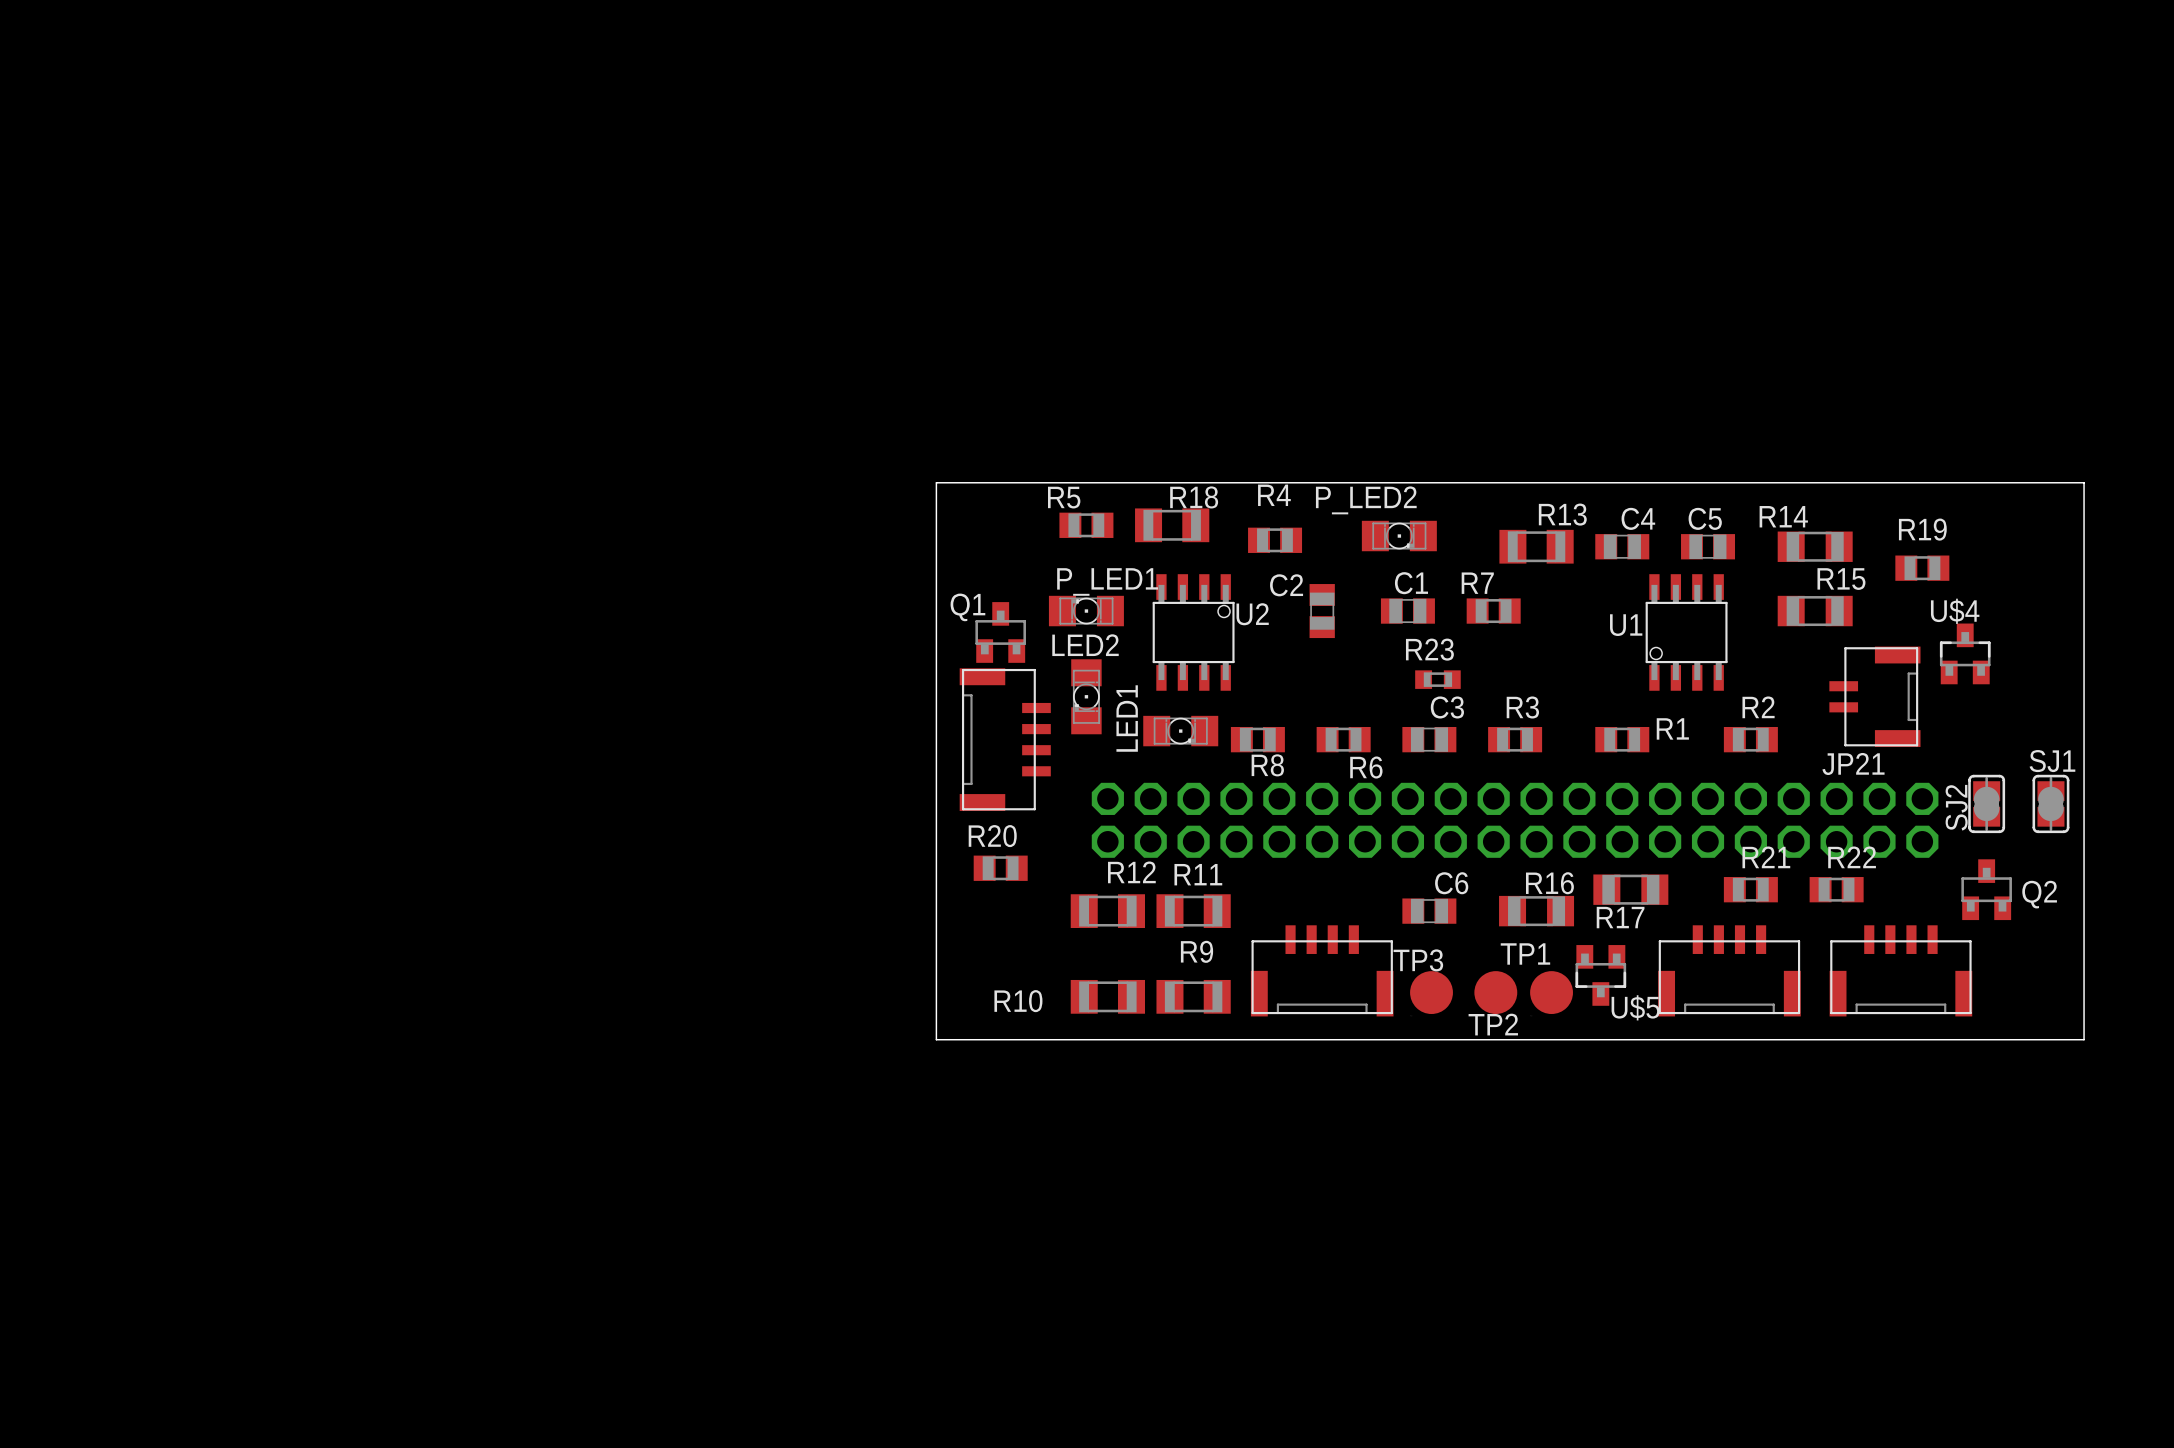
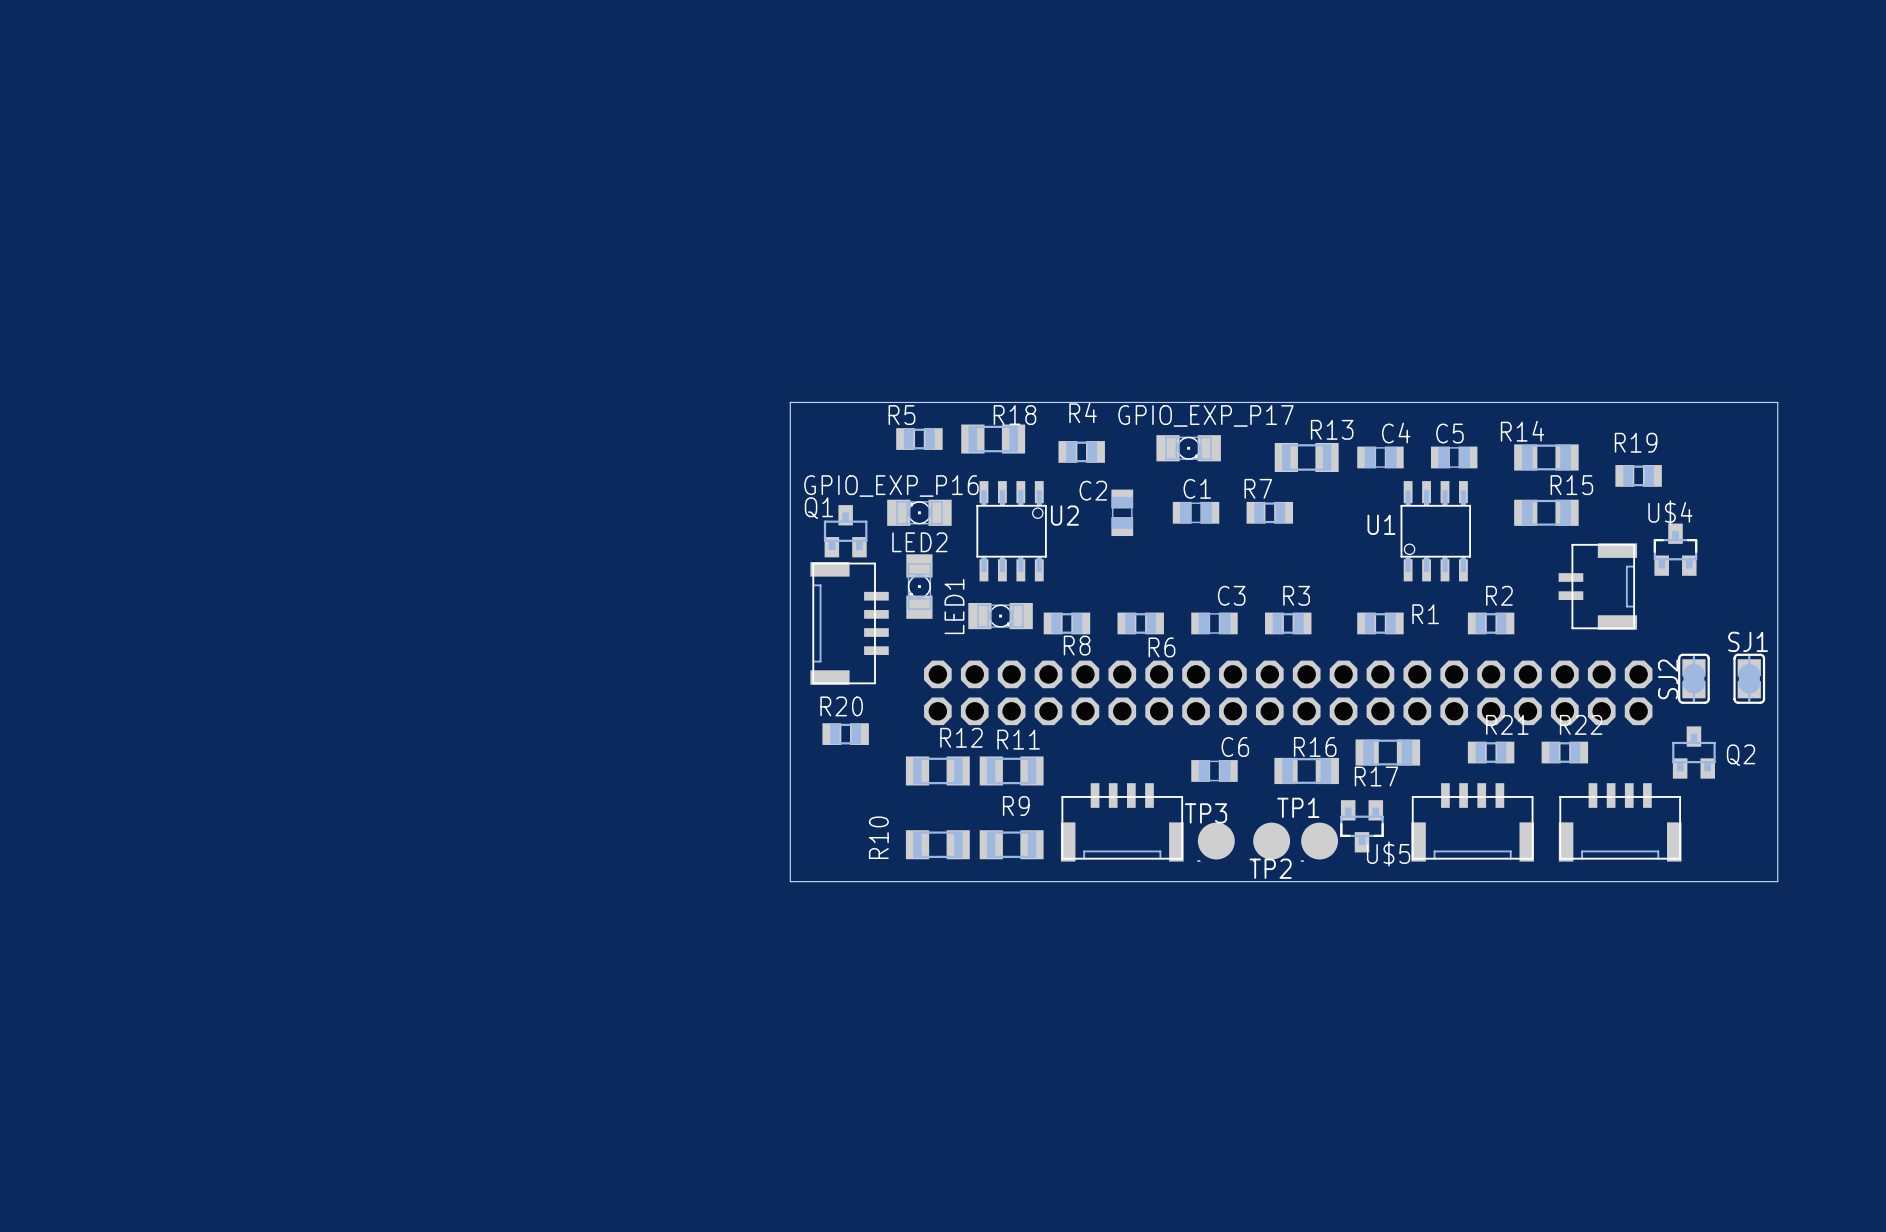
P_LED2 name: P_LED2 (1366, 500) -> GPIO_EXP_P17 (1205, 415)
P_LED1 name: P_LED1 (1107, 581) -> GPIO_EXP_P16 (891, 486)
R23: (1437, 679) -> none
JP21 name: JP21 (1853, 763) -> none
R10 name rotation: 0° (1018, 1001) -> 90° counterclockwise (878, 837)

